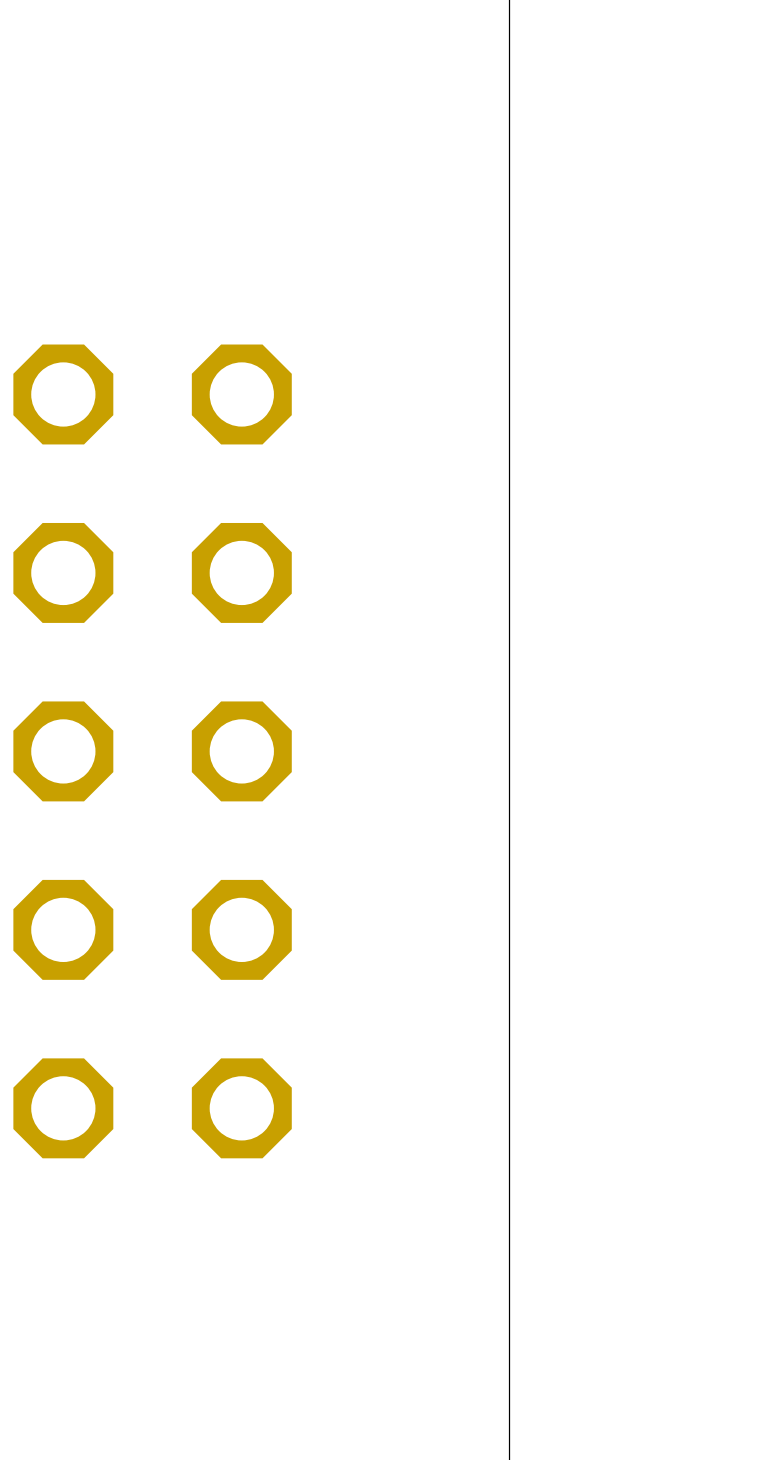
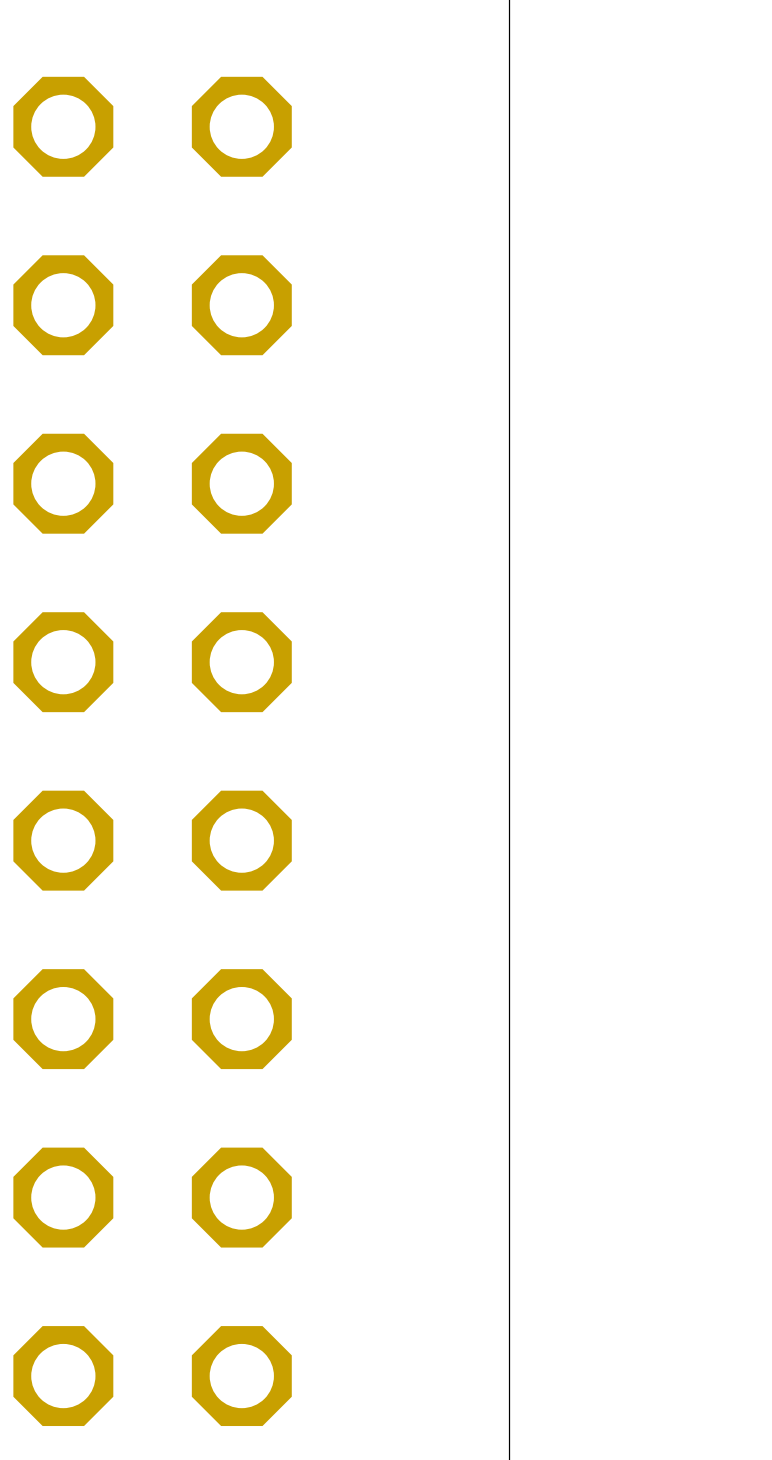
part footprint: [13, 344, 292, 1159] -> [13, 76, 292, 1427]

